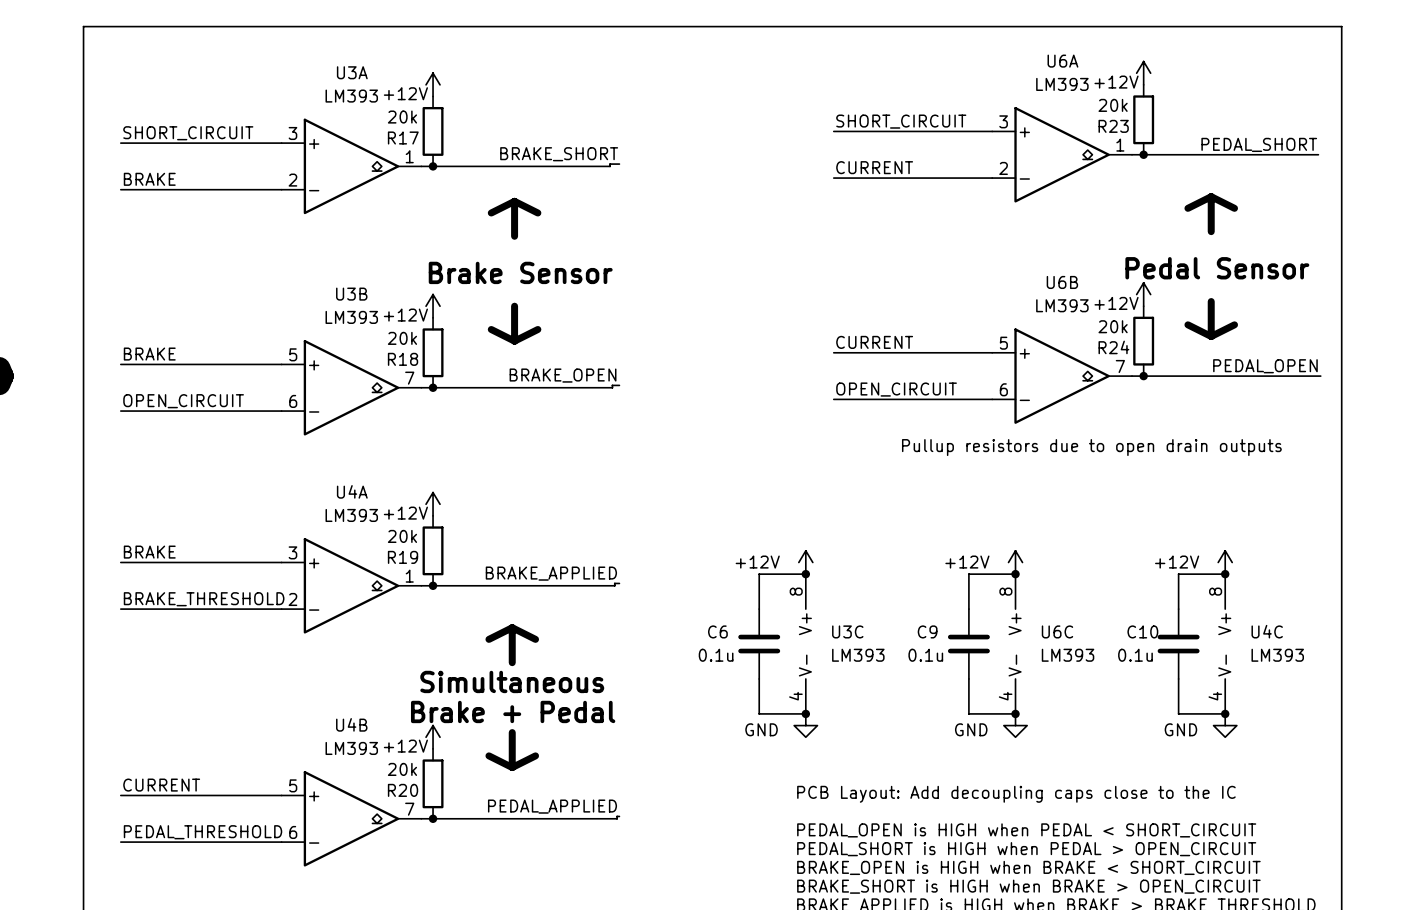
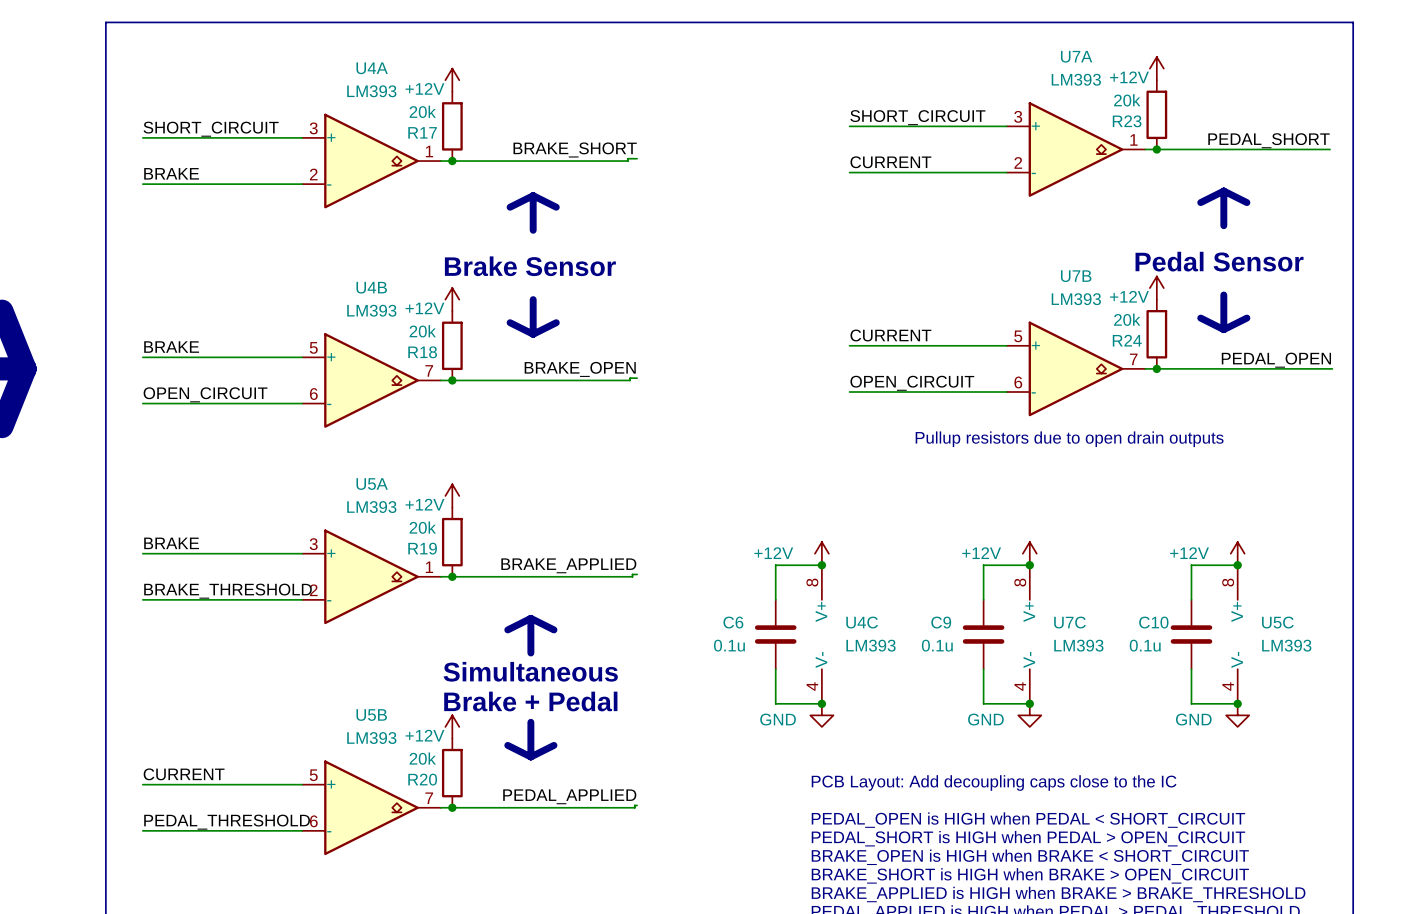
U6A name: U6A (1062, 61) -> U7A (1076, 56)
U3A name: U3A (352, 72) -> U4A (372, 68)
U6B name: U6B (1062, 282) -> U7B (1076, 276)
U3B name: U3B (351, 294) -> U4B (371, 287)
U4A name: U4A (352, 491) -> U5A (372, 484)
U3C name: U3C (847, 631) -> U4C (862, 622)
U6C name: U6C (1057, 631) -> U7C (1070, 622)
U4C name: U4C (1267, 631) -> U5C (1277, 622)
U4B name: U4B (351, 724) -> U5B (371, 715)

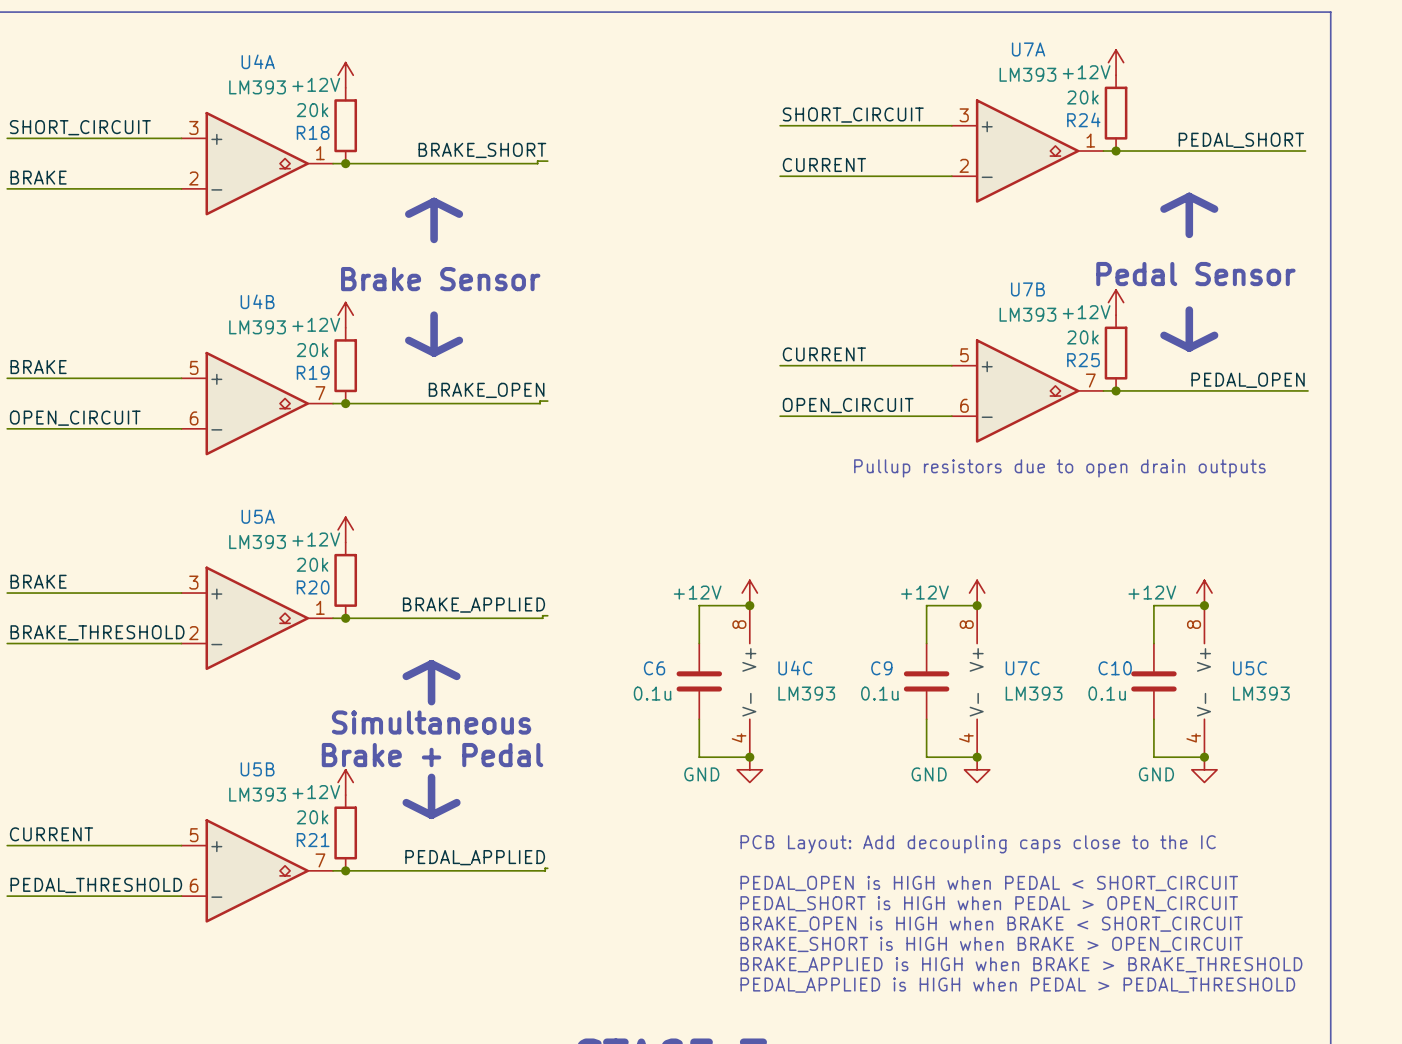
R23 name: R23 (1127, 121) -> R24 (1083, 119)
R17 name: R17 (422, 132) -> R18 (313, 132)
R24 name: R24 (1127, 340) -> R25 (1083, 360)
R18 name: R18 (422, 352) -> R19 (313, 372)
R19 name: R19 (422, 548) -> R20 (313, 587)
R20 name: R20 (422, 779) -> R21 (313, 840)

